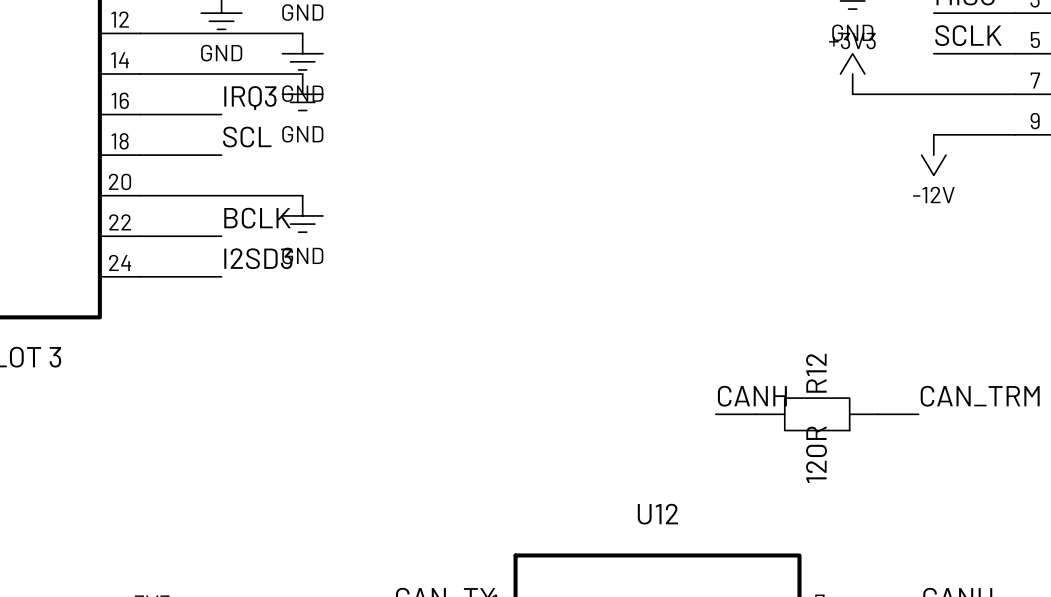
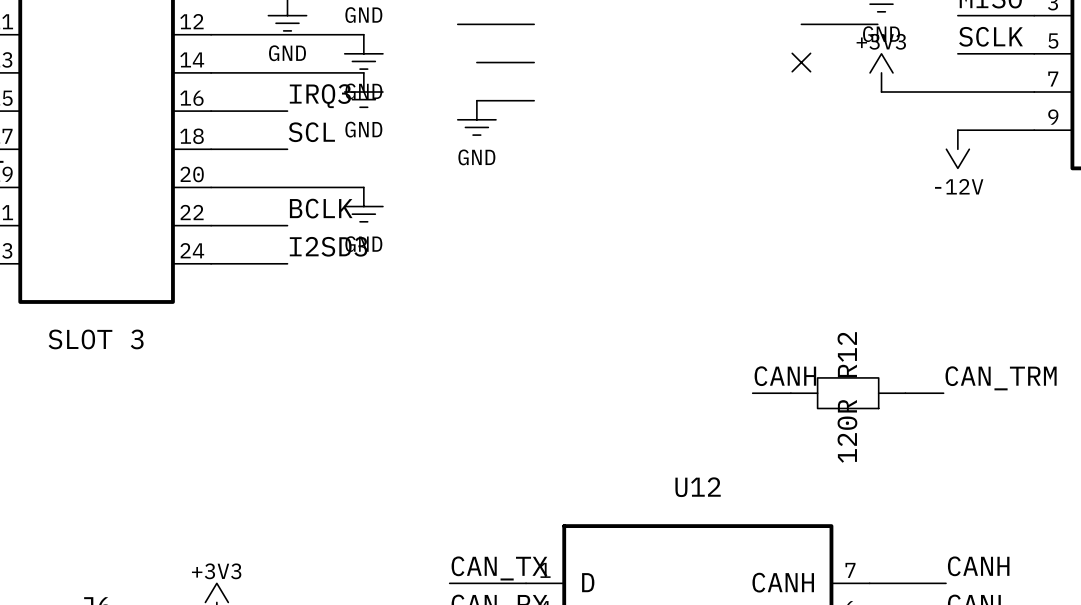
wire: none -> (457, 24) (534, 24)
wire: none -> (801, 24) (877, 24)
wire: none -> (476, 62) (534, 62)
no-connect mark: none -> (801, 62)
wire: none -> (476, 100) (534, 100)
power symbol: none -> GND (476, 117)

